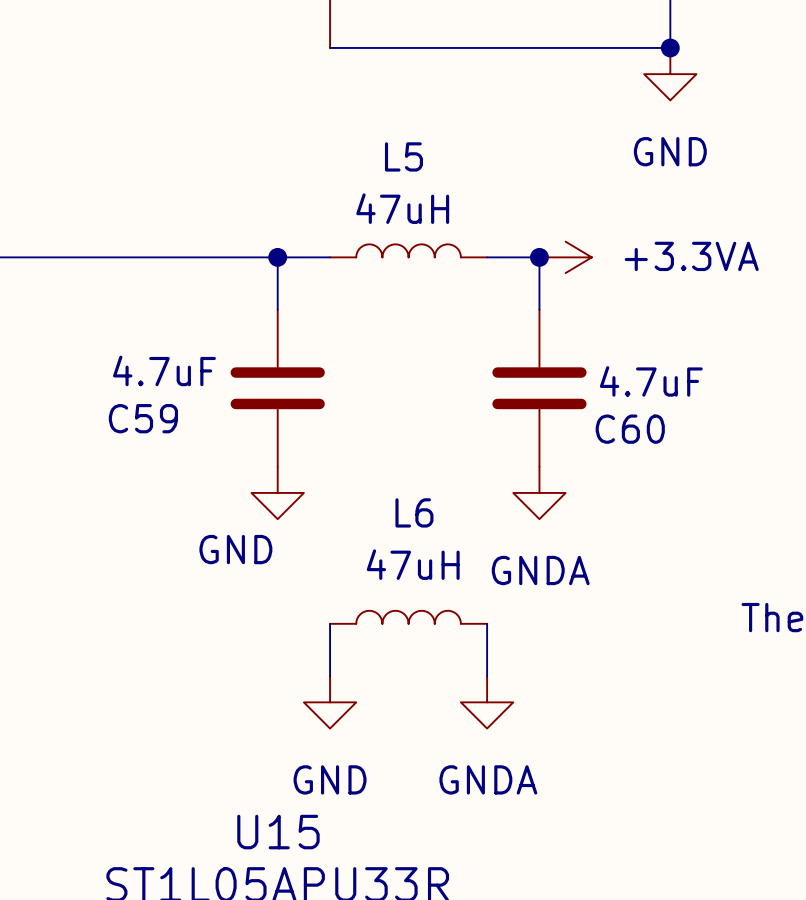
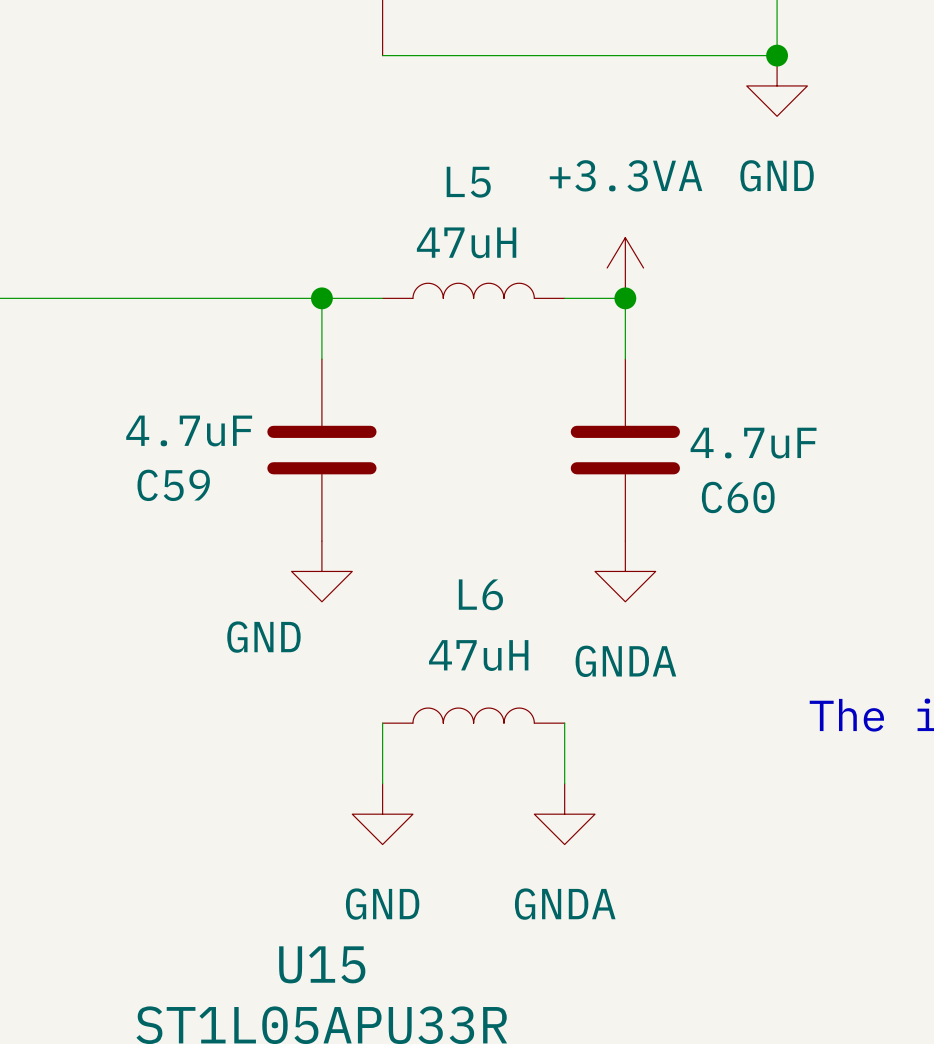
power symbol text position: +3.3VA (691, 256) -> +3.3VA (626, 175)
power symbol rotation: 0° (565, 257) -> 90° counterclockwise (625, 268)
power symbol position: +3.3VA (565, 257) -> +3.3VA (625, 268)

